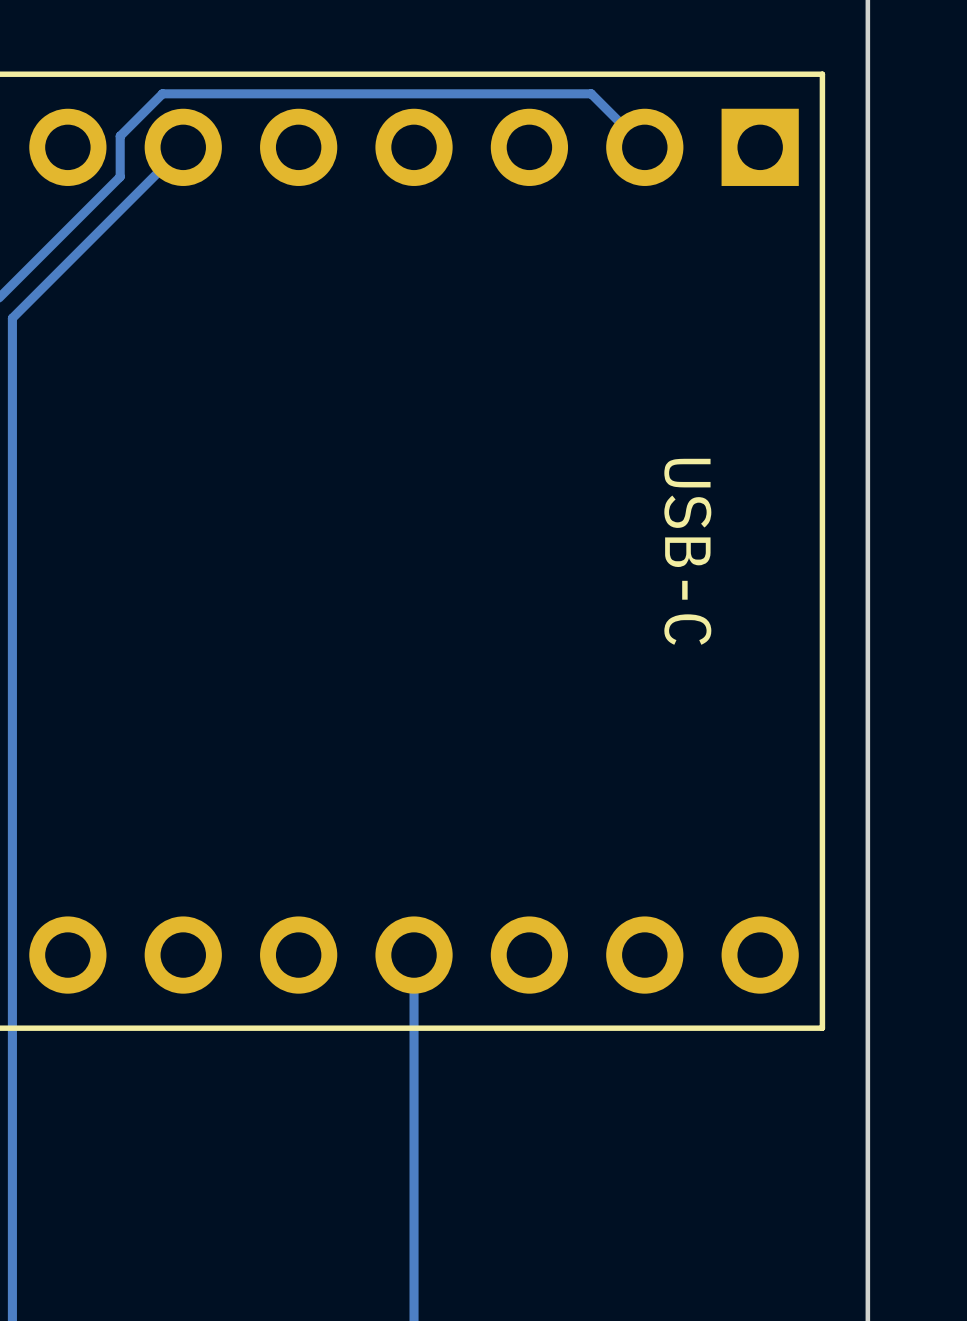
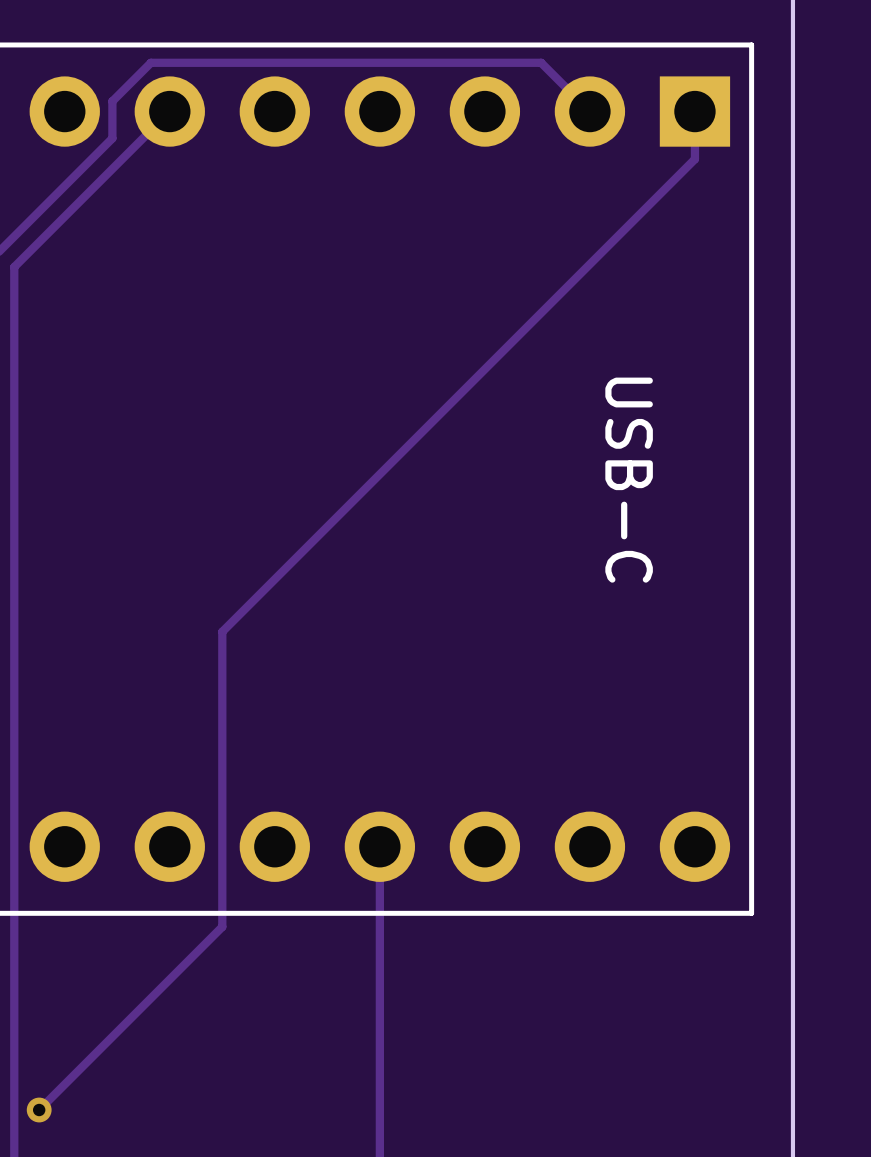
track: none -> (694, 111) (694, 159) (222, 631) (222, 926) (39, 1110)
via: none -> (39, 1110)

